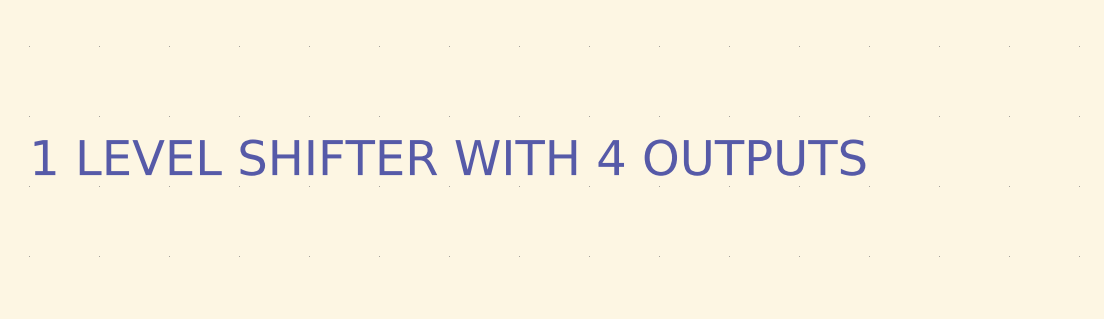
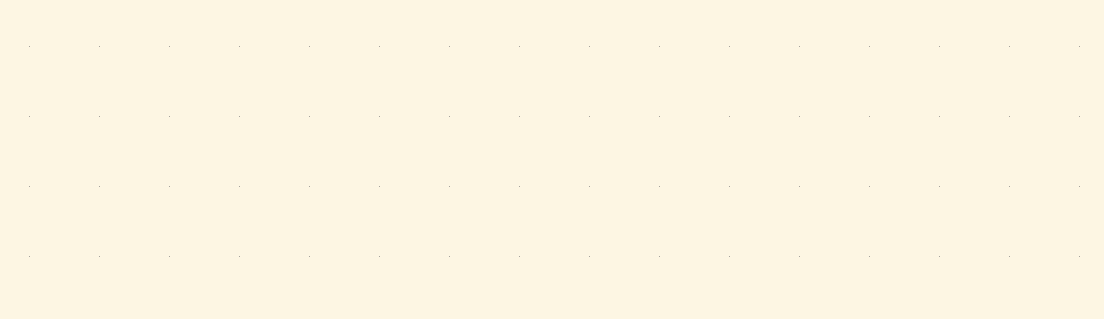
text: 1 LEVEL SHIFTER WITH 4 OUTPUTS (449, 157) -> none

